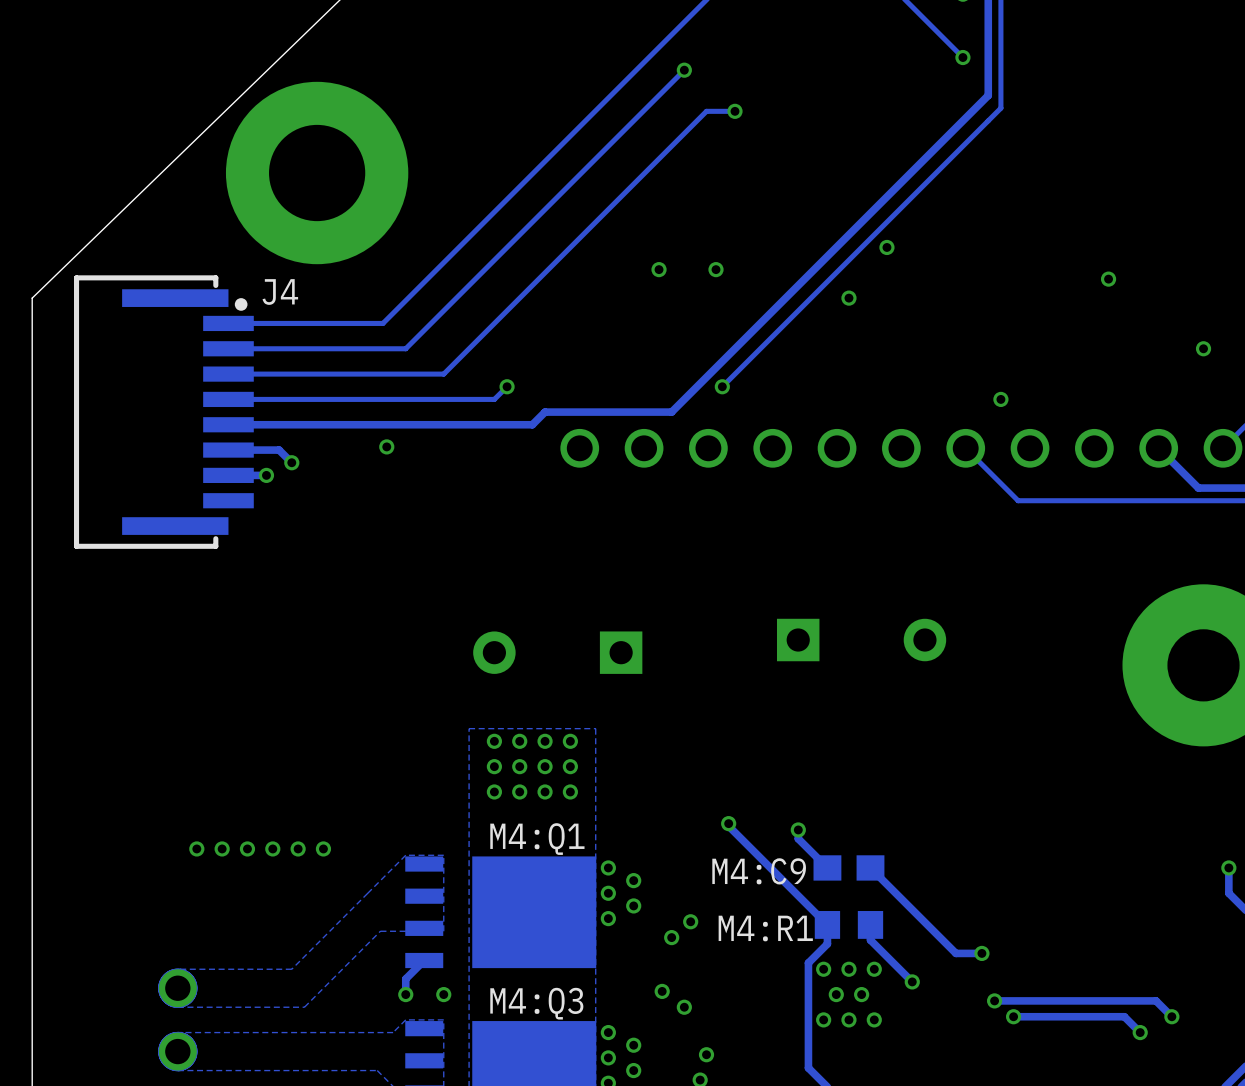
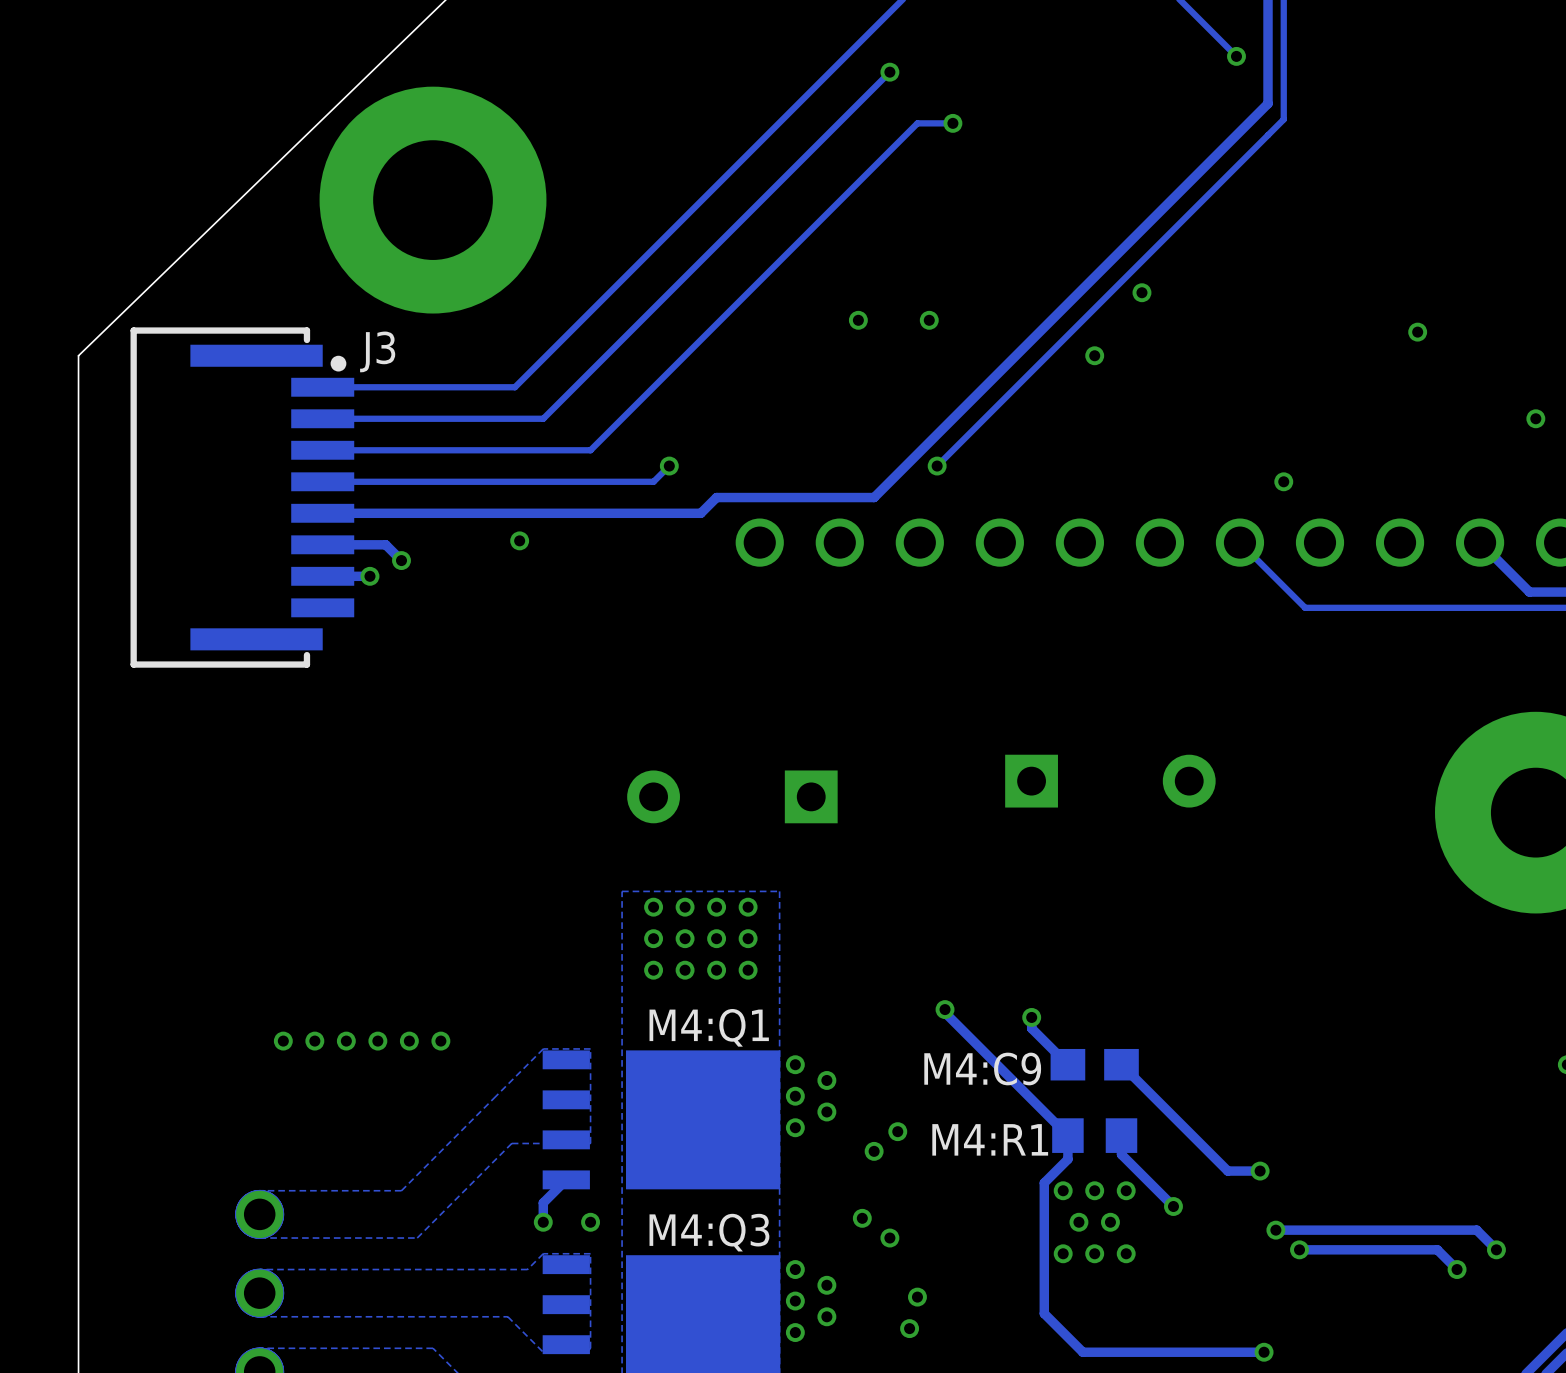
J4 name: J4 (280, 292) -> J3 (377, 351)

